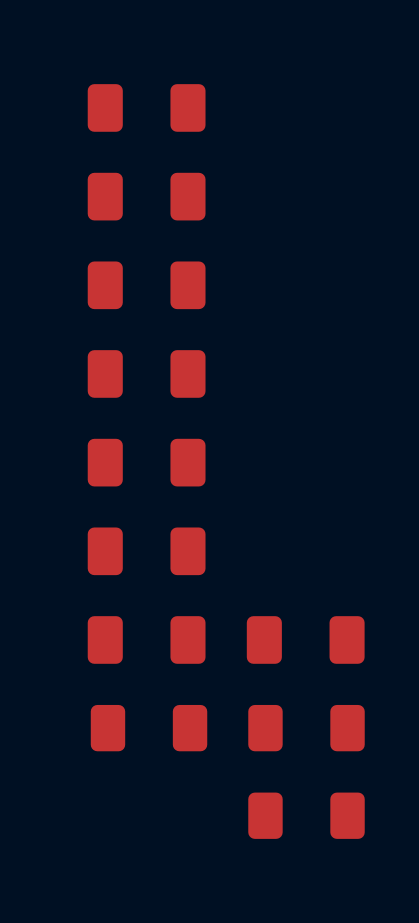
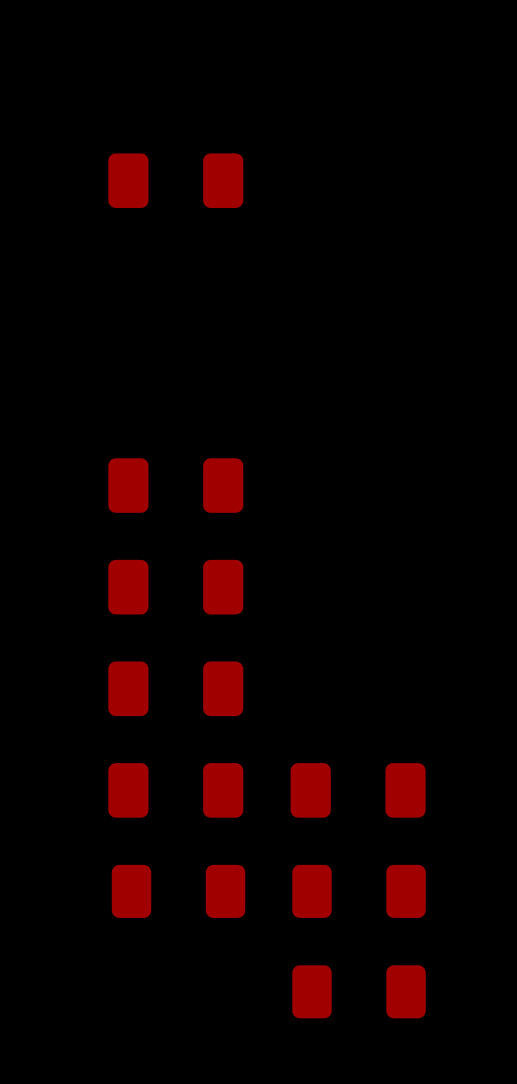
part: (146, 196) -> none
part: (146, 285) -> none

